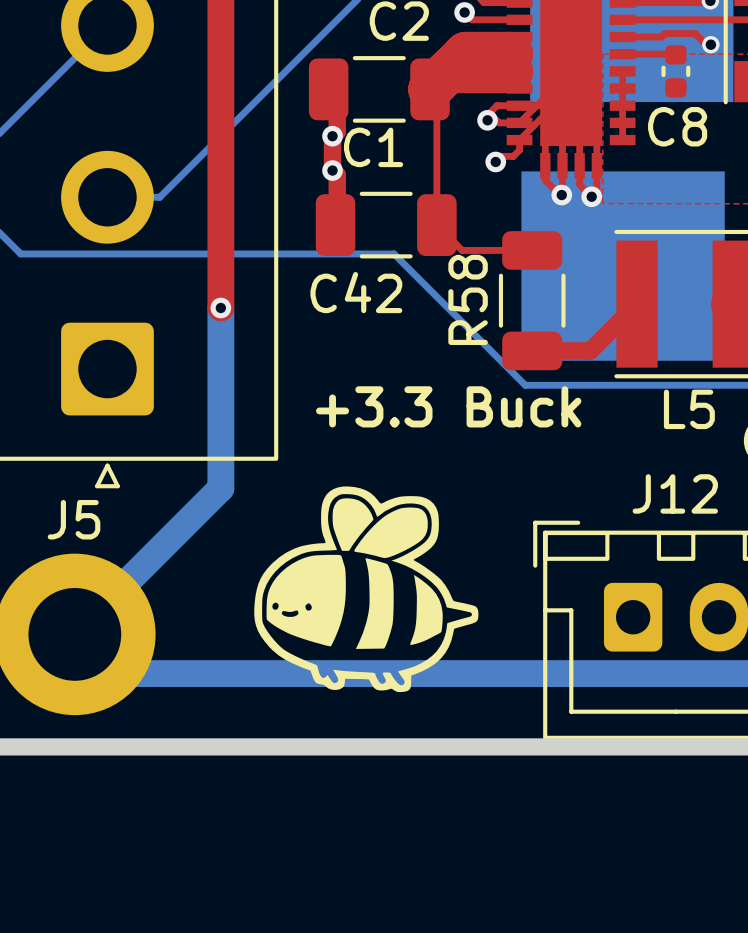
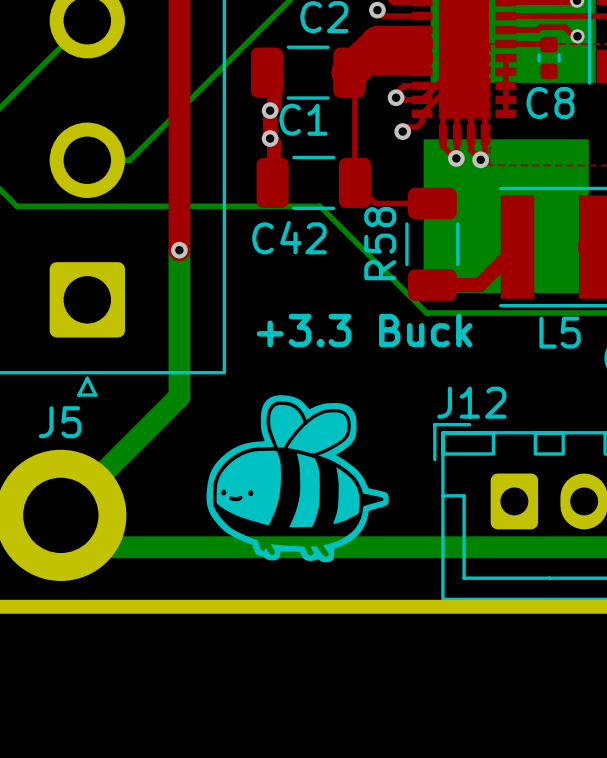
J12 name position: J12 (675, 493) -> J12 (471, 402)

